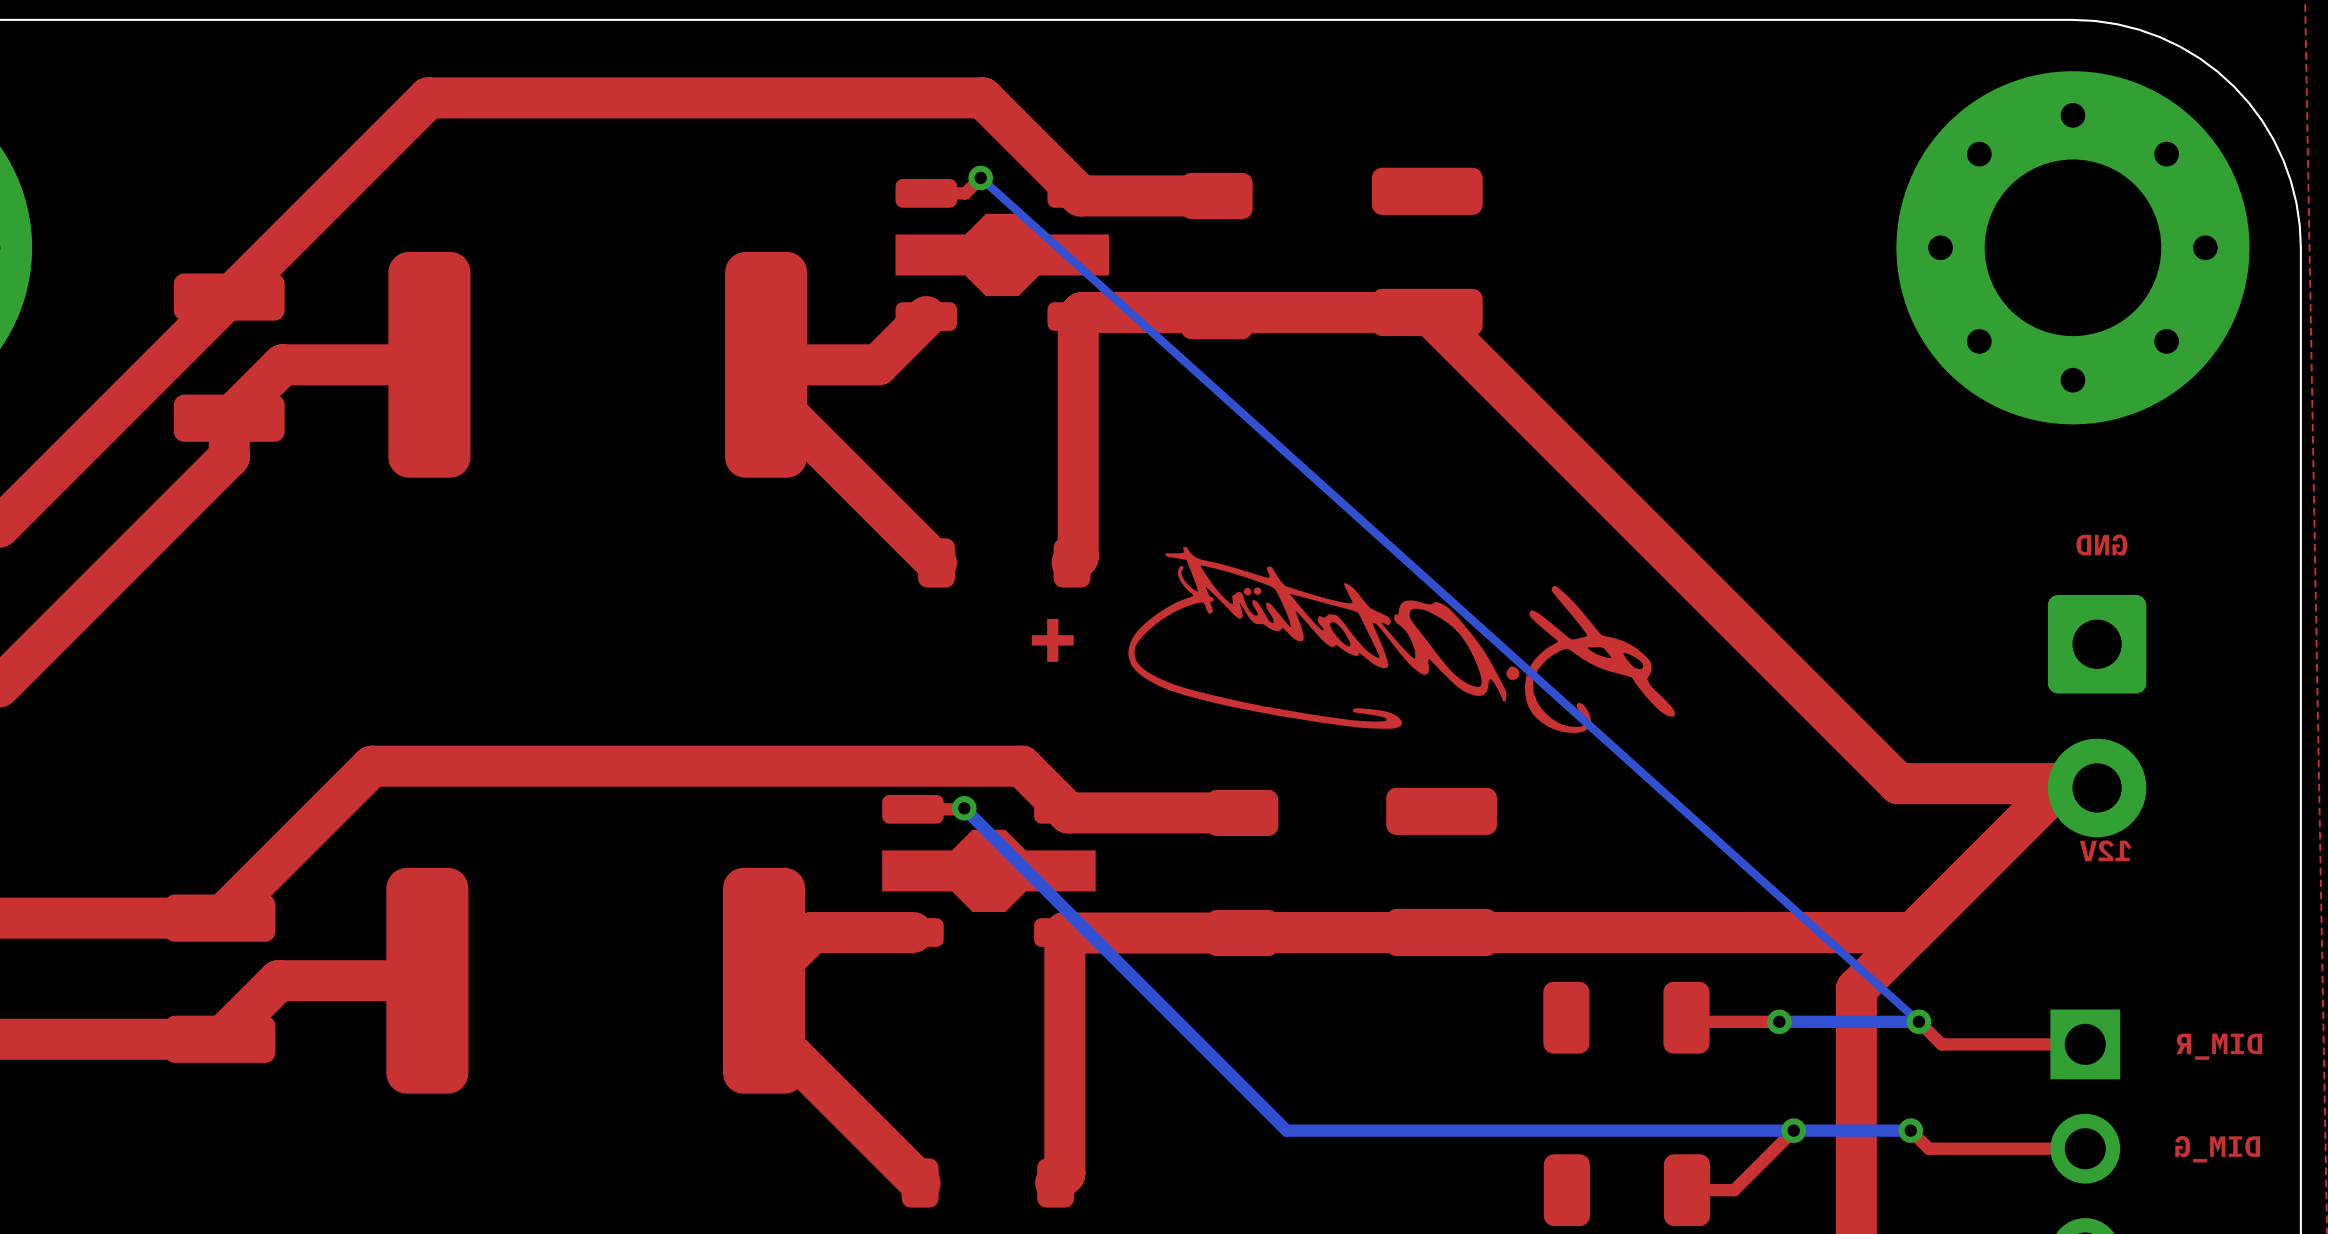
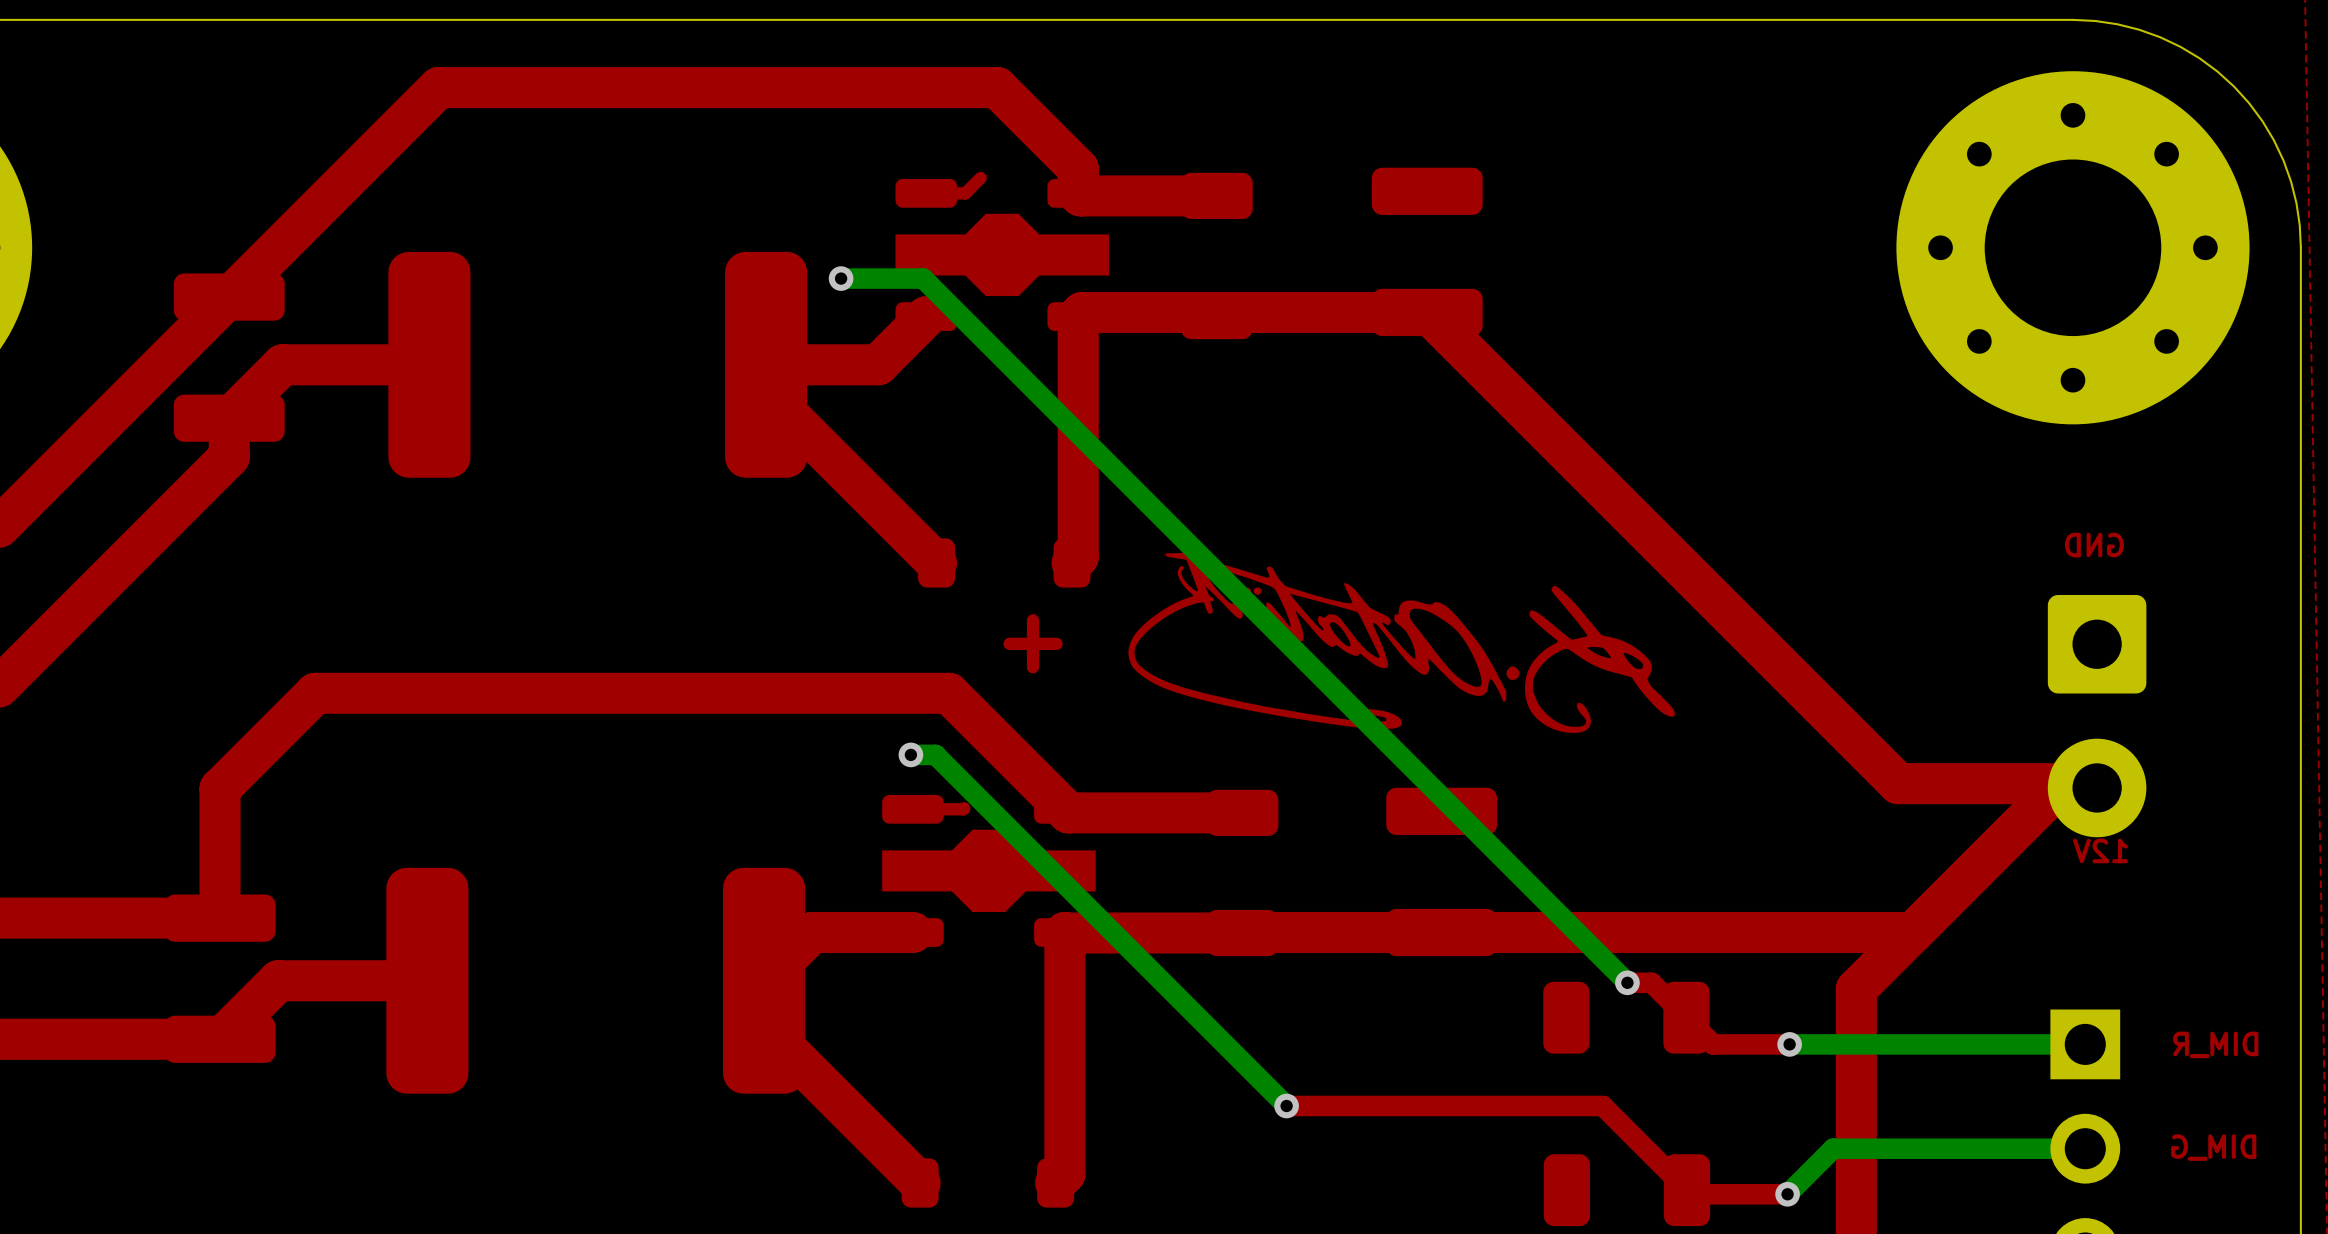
top track: (428, 97) (982, 97) (1078, 193) -> (428, 97) (438, 87) (997, 87) (1078, 168) (1078, 193)
bottom track: (980, 177) (1918, 1021) (1779, 1021) -> none
via position: (980, 177) -> (841, 278)
bottom track: none -> (841, 278) (923, 278) (1627, 982)
bottom track: none -> (910, 754) (935, 754) (1286, 1105)
top track: (1021, 766) (371, 766) (220, 918) -> (1021, 766) (948, 693) (315, 693) (220, 788) (220, 918)
bottom track: (964, 808) (1286, 1130) (1910, 1130) -> none
via position: (964, 808) -> (910, 754)
top track: none -> (1627, 982) (1651, 982) (1713, 1044) (1789, 1044)
via: none -> (1627, 982)
top track: (1779, 1021) (1690, 1021) -> none
via position: (1779, 1021) -> (1789, 1044)
top track: (1918, 1021) (1941, 1044) (2085, 1044) -> none
via: (1918, 1021) -> none
bottom track: none -> (2085, 1044) (1789, 1044)
top track: none -> (1286, 1105) (1602, 1105) (1691, 1194) (1787, 1194)
via: none -> (1286, 1105)
top track: (1793, 1130) (1734, 1190) (1686, 1190) -> none
via: (1793, 1130) -> none
top track: (1910, 1130) (1928, 1148) (2085, 1148) -> none
via: (1910, 1130) -> none
bottom track: none -> (2085, 1148) (1833, 1148) (1787, 1194)
via: none -> (1787, 1194)

